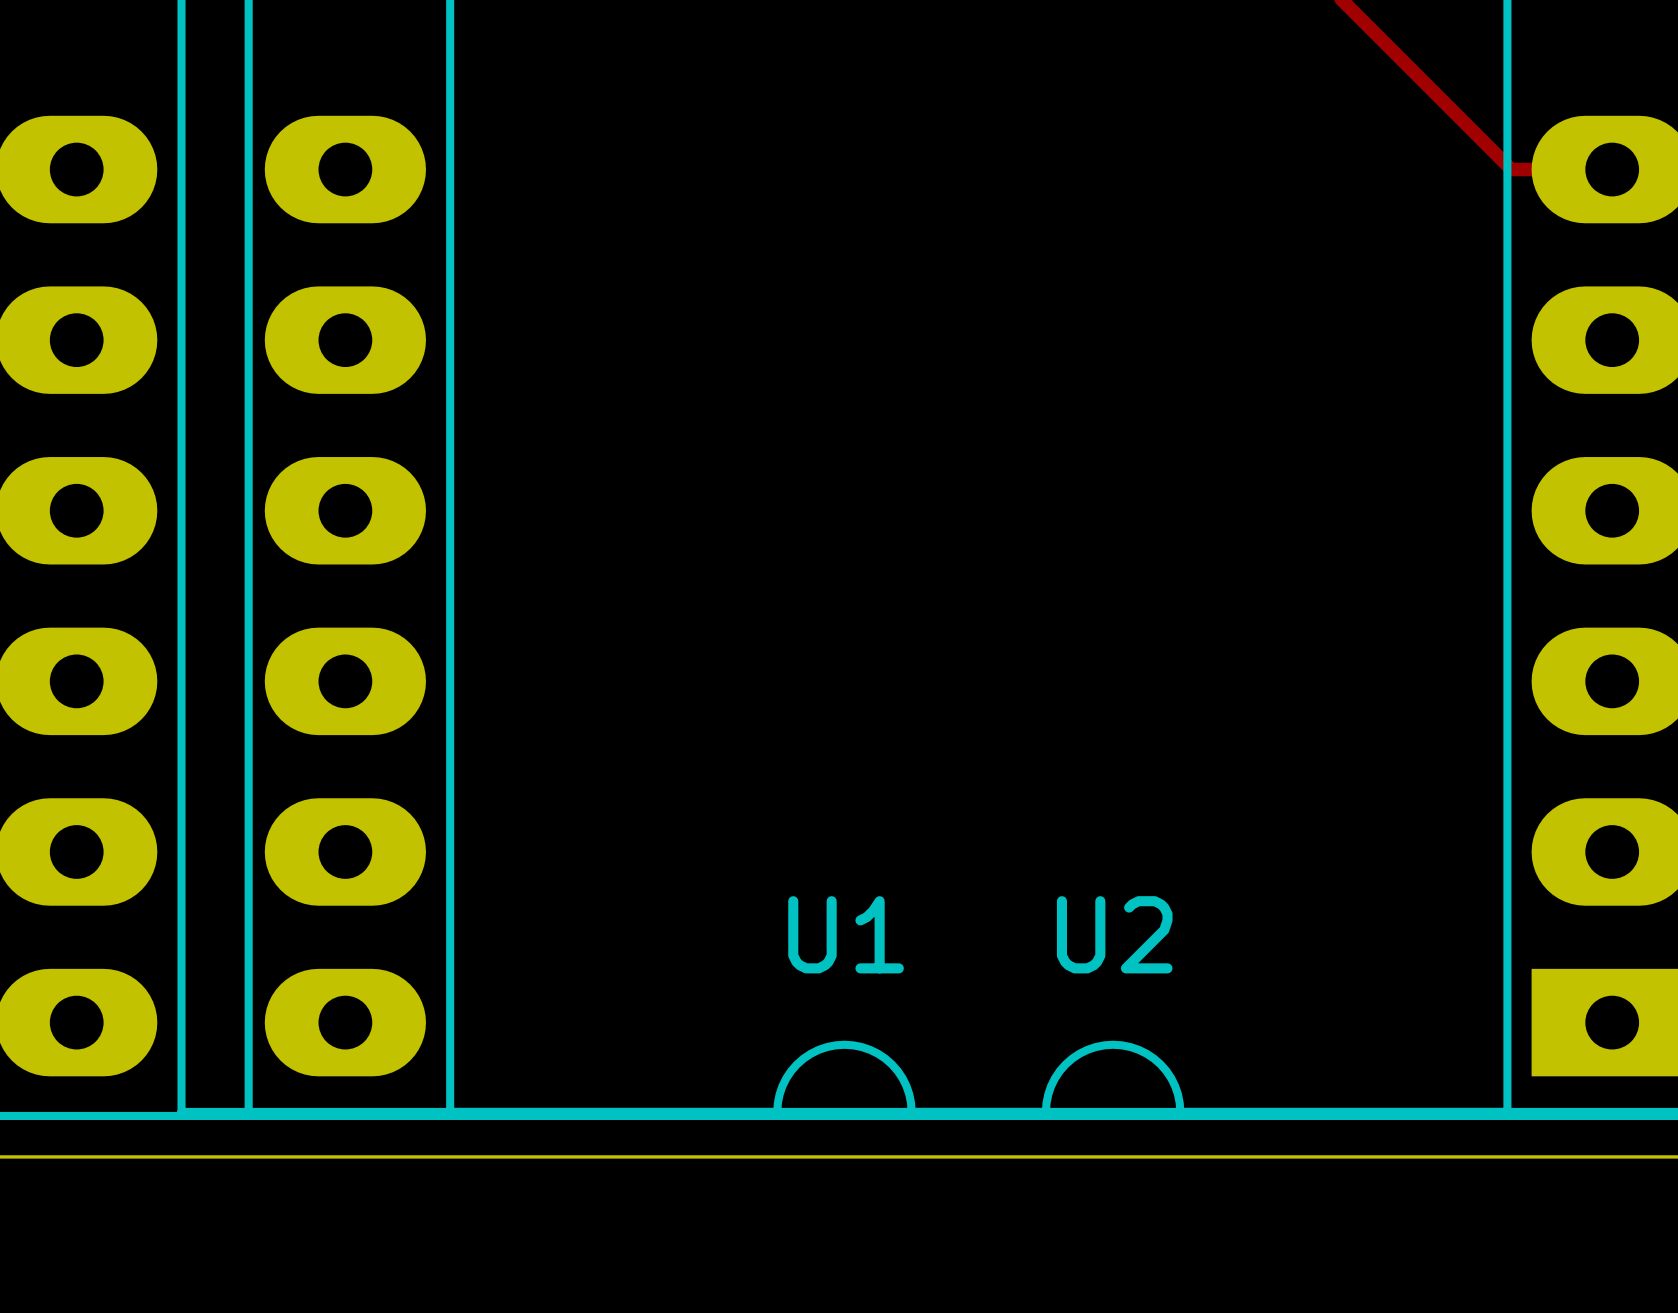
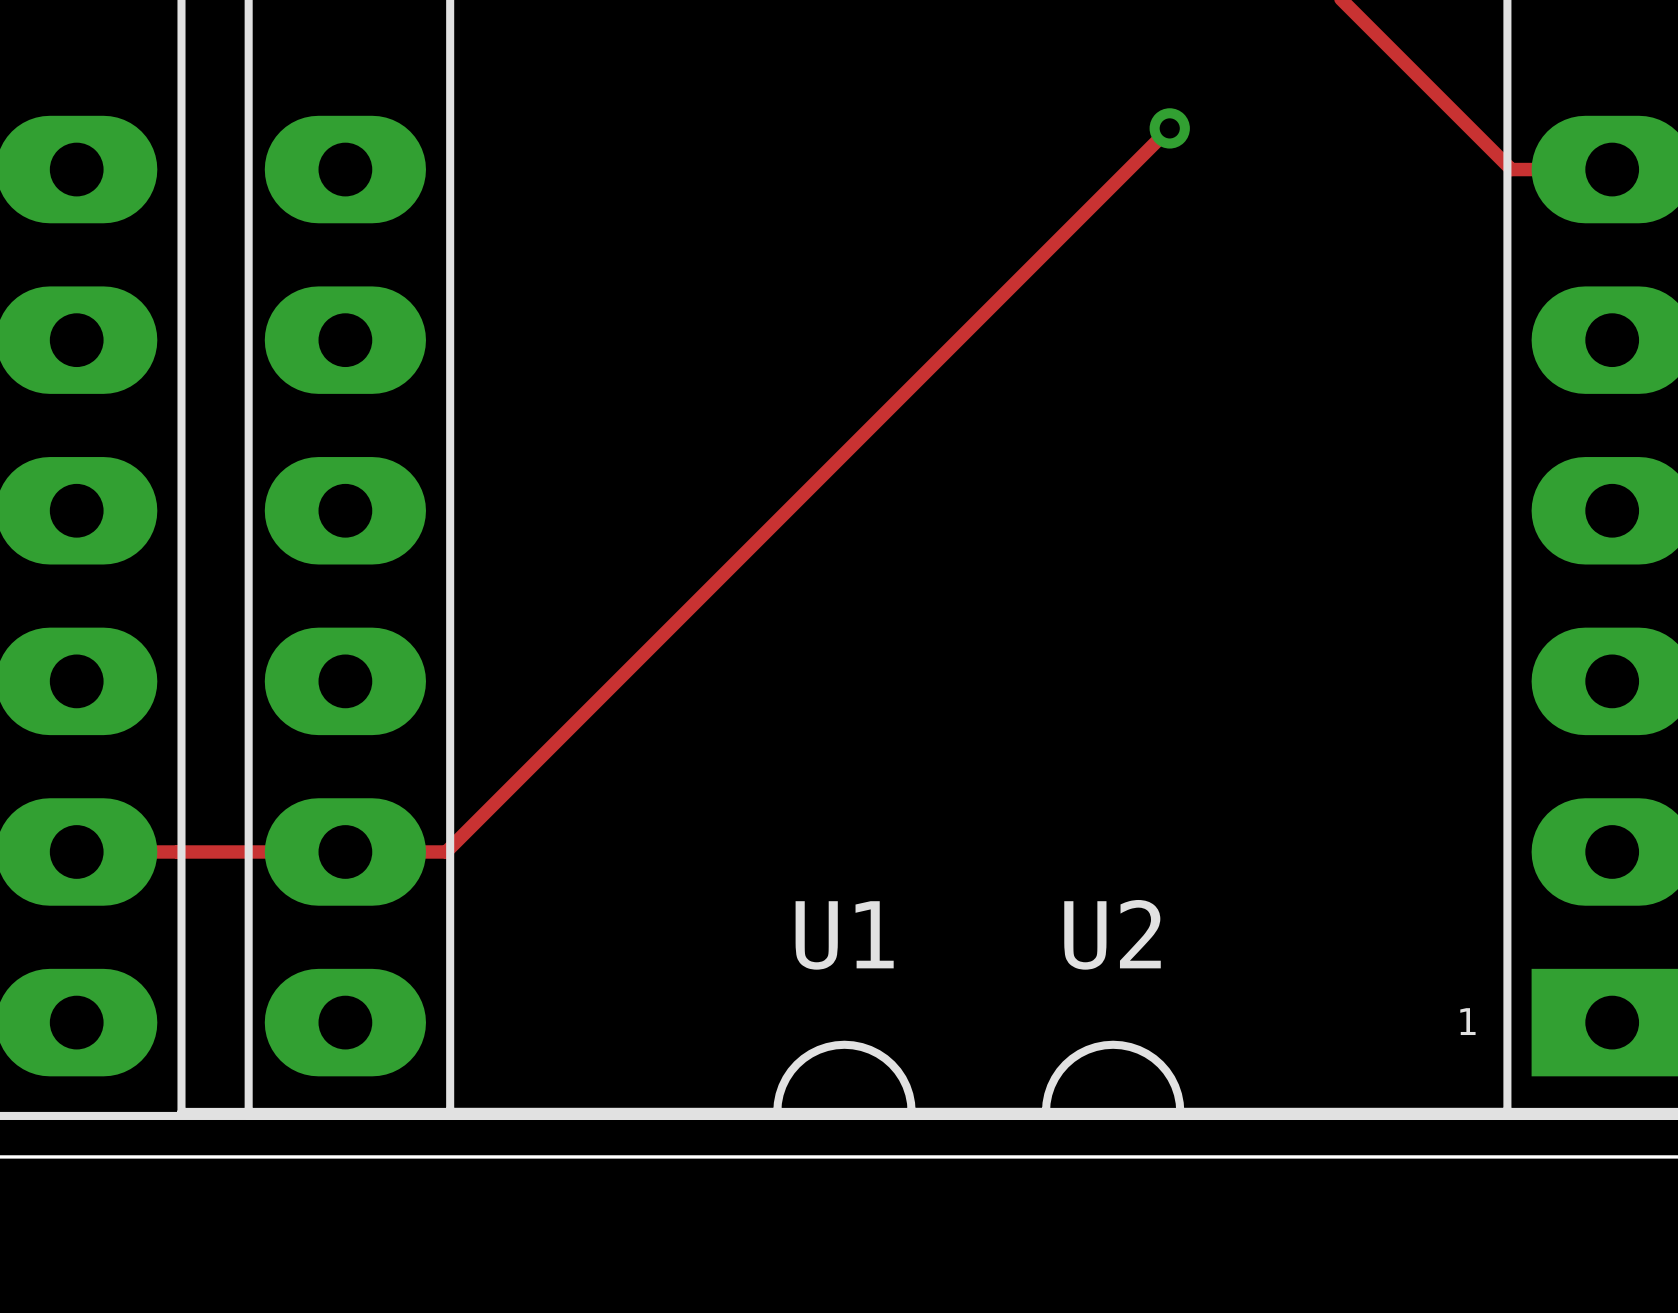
track: none -> (1169, 128) (446, 851) (76, 851)
via: none -> (1169, 128)
text: none -> 1 (1467, 1021)

